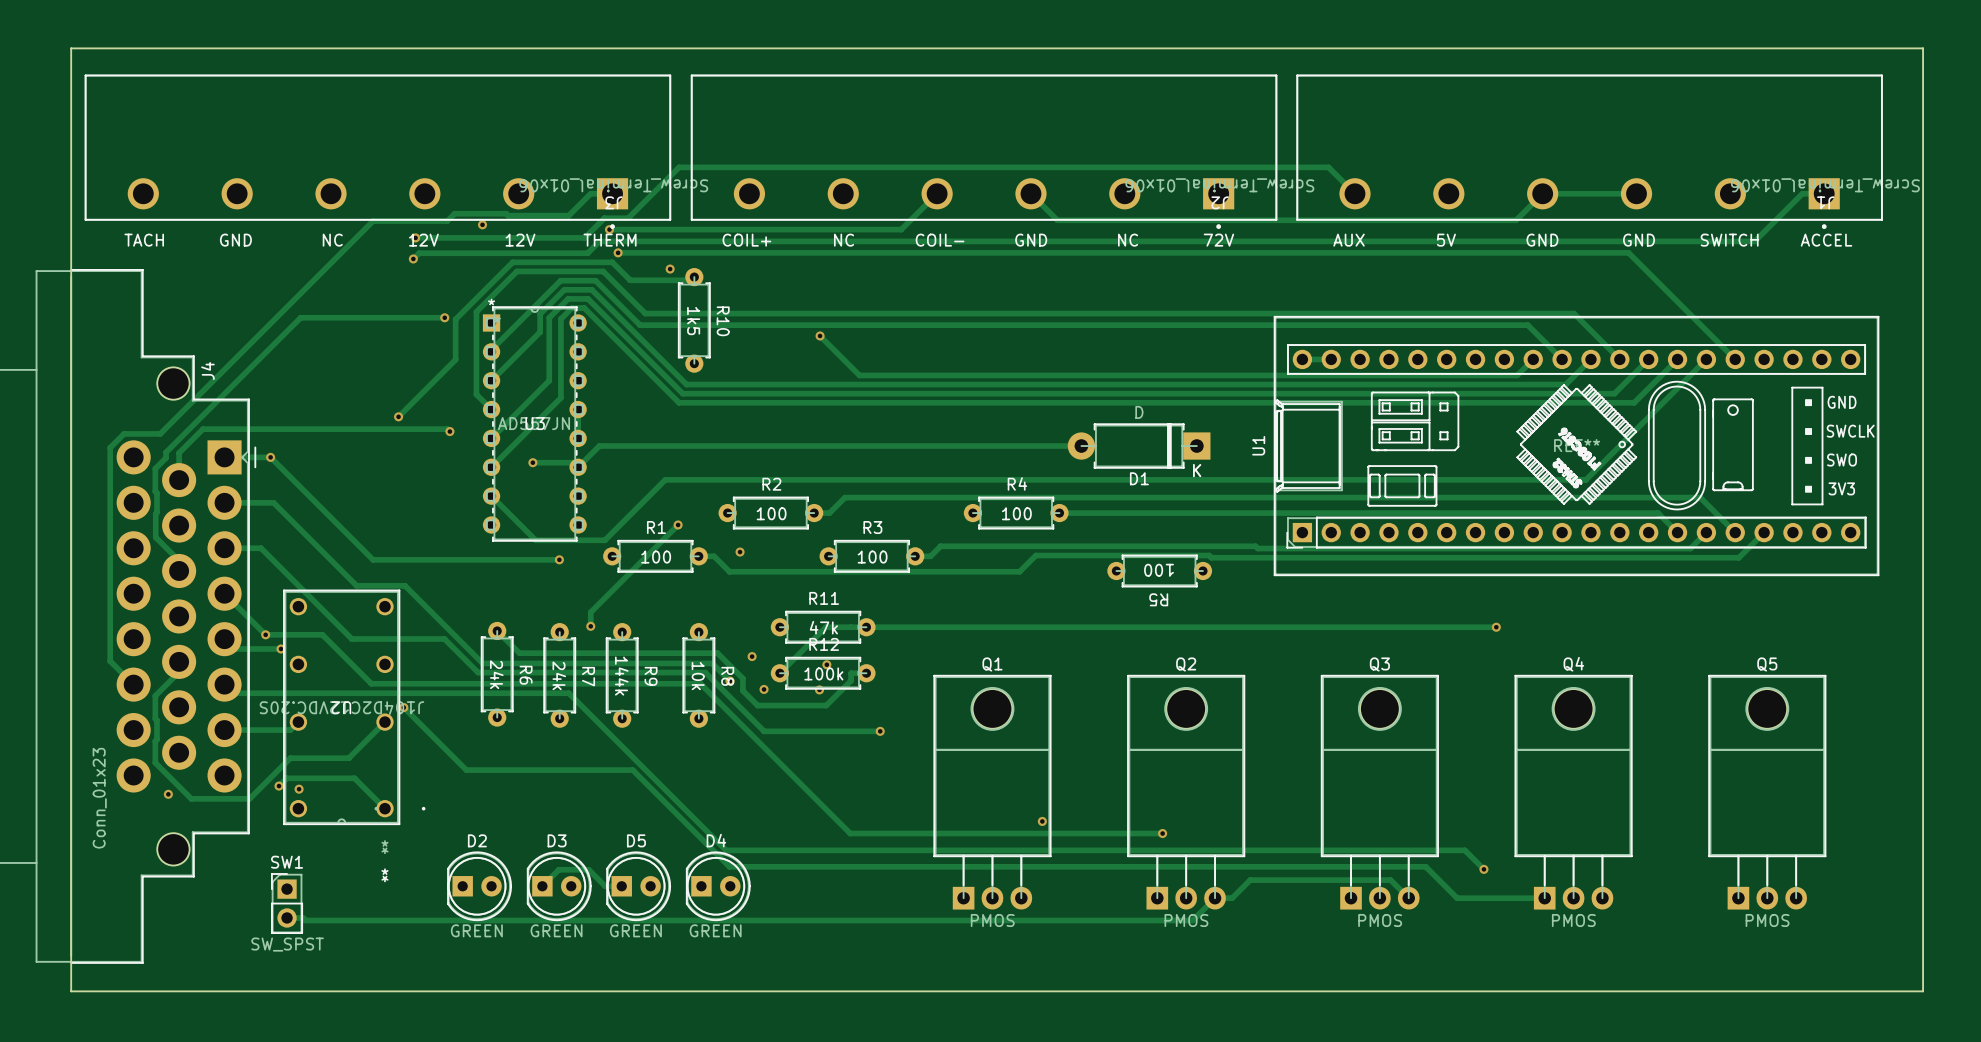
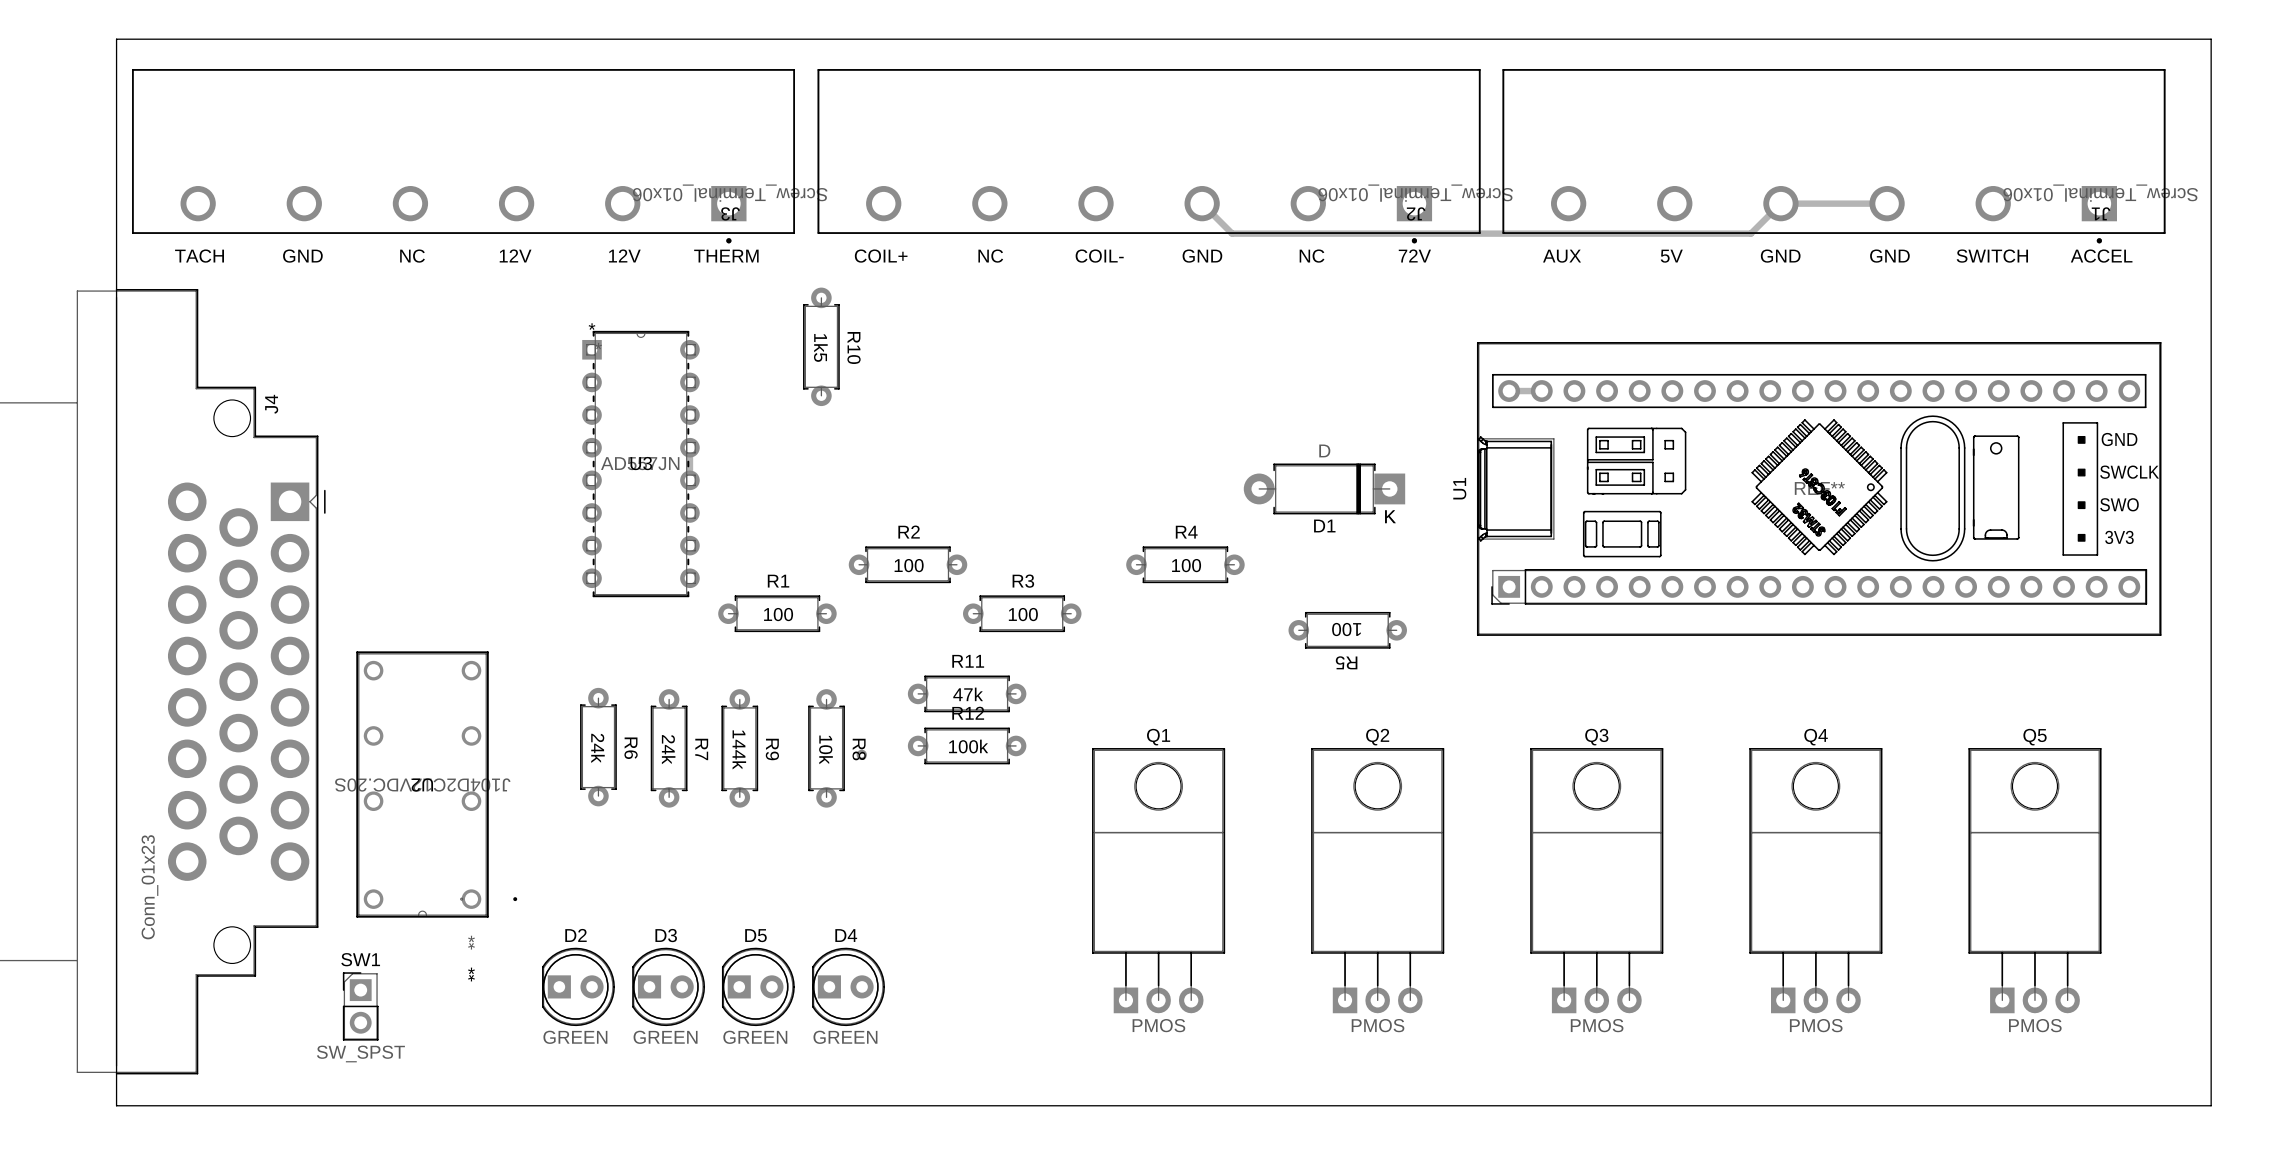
track: (612, 193) (590, 193) (568, 215) (454, 213) (447, 221) (373, 221) (160, 433) (124, 433) (110, 447) (110, 661) (133, 684) -> none
track: (937, 193) (901, 229) (609, 229) -> none
track: (1355, 193) (1328, 167) (679, 167) (628, 218) (604, 218) (584, 237) (415, 237) -> none
track: (1824, 193) (1802, 193) (1754, 241) (599, 241) (587, 253) (419, 253) (413, 258) -> none
via: (482, 224) -> none
via: (609, 229) -> none
via: (415, 237) -> none
track: (618, 252) (1628, 252) (1735, 359) -> none
via: (618, 252) -> none
via: (413, 258) -> none
via: (670, 269) -> none
track: (694, 277) (691, 280) (630, 280) (612, 262) (512, 262) (455, 319) (455, 359) (398, 416) -> none
track: (444, 317) (300, 317) (166, 452) (166, 457) (155, 468) (155, 537) (179, 560) (179, 570) -> none
via: (444, 317) -> none
track: (820, 335) (859, 375) (1517, 375) (1533, 359) -> none
via: (820, 335) -> none
track: (491, 351) (560, 280) (595, 280) (640, 325) (1527, 325) (1562, 359) -> none
track: (1590, 359) (1565, 384) (686, 384) (591, 289) (564, 289) (540, 314) (540, 332) (491, 380) -> none
track: (1619, 359) (1573, 313) (645, 313) (603, 271) (516, 271) (476, 311) (476, 394) (491, 409) -> none
track: (1648, 359) (1614, 393) (682, 393) (588, 298) (568, 298) (549, 317) (549, 380) (491, 438) -> none
track: (1677, 359) (1634, 402) (679, 402) (584, 308) (571, 308) (560, 319) (560, 397) (491, 467) -> none
track: (1706, 359) (1586, 479) (665, 479) (604, 540) (535, 540) (491, 496) -> none
via: (398, 416) -> none
track: (449, 431) (447, 429) (202, 429) (179, 453) (179, 480) -> none
via: (449, 431) -> none
track: (1081, 446) (599, 446) (578, 467) (573, 462) (532, 462) -> none
track: (224, 457) (270, 457) (373, 559) (559, 559) -> none
via: (270, 457) -> none
via: (532, 462) -> none
track: (224, 502) (273, 502) (356, 585) (405, 585) (482, 663) (712, 663) (730, 681) -> none
track: (814, 513) (829, 513) (845, 497) (1700, 497) (1735, 532) -> none
track: (1059, 513) (1658, 513) (1677, 532) -> none
track: (678, 524) (590, 612) (590, 626) -> none
via: (678, 524) -> none
track: (1706, 532) (1690, 548) (940, 546) (930, 556) (915, 556) -> none
track: (1764, 532) (1738, 557) (1211, 557) (1209, 555) (1035, 555) (1019, 571) (729, 571) (714, 556) (698, 556) -> none
track: (224, 548) (261, 548) (351, 638) (444, 638) (478, 672) (705, 672) (764, 731) (880, 731) -> none
via: (740, 552) -> none
via: (559, 559) -> none
track: (224, 593) (265, 634) (322, 634) (371, 683) (700, 683) (850, 833) (1162, 833) -> none
via: (590, 626) -> none
track: (1496, 627) (825, 627) (779, 673) -> none
via: (1496, 627) -> none
track: (497, 630) (519, 653) (717, 653) (742, 678) (742, 690) (757, 705) (826, 705) (851, 680) (851, 673) (866, 673) -> none
via: (265, 634) -> none
track: (224, 639) (234, 648) (281, 648) -> none
via: (281, 648) -> none
via: (752, 656) -> none
track: (179, 661) (179, 672) (155, 695) (155, 718) (156, 720) (155, 762) (191, 798) (249, 798) (290, 758) (348, 758) (384, 722) -> none
via: (826, 664) -> none
track: (224, 684) (233, 693) (568, 693) (725, 850) (1464, 850) (1483, 869) -> none
via: (764, 689) -> none
via: (819, 689) -> none
track: (403, 707) (466, 770) (632, 770) (729, 866) (1425, 866) (1457, 898) (1544, 898) -> none
via: (403, 707) -> none
track: (298, 722) (290, 730) (224, 730) -> none
via: (880, 731) -> none
track: (279, 786) (286, 778) (354, 778) (384, 808) -> none
via: (279, 786) -> none
via: (299, 789) -> none
via: (168, 794) -> none
via: (1042, 821) -> none
via: (1162, 833) -> none
via: (1483, 869) -> none
track: (542, 886) (558, 869) (588, 869) (605, 886) (621, 886) -> none
track: (1408, 898) (1390, 880) (1250, 880) (1232, 898) (1215, 898) (1192, 920) (305, 920) (302, 917) (287, 917) -> none

